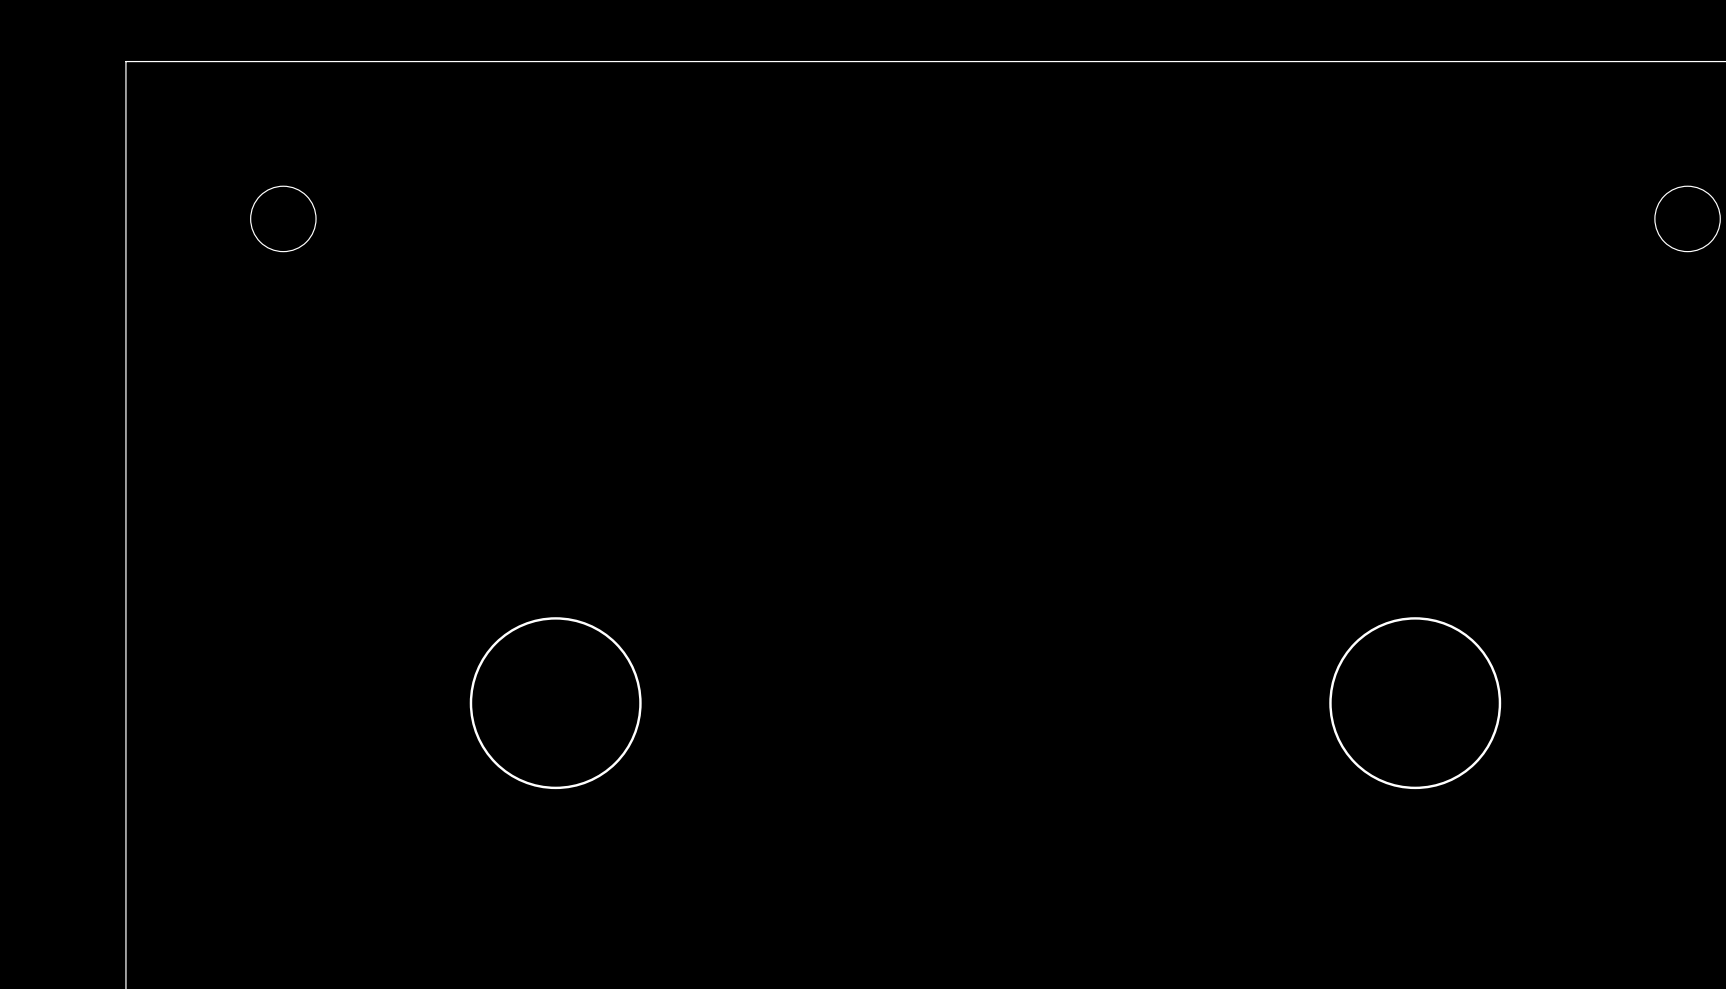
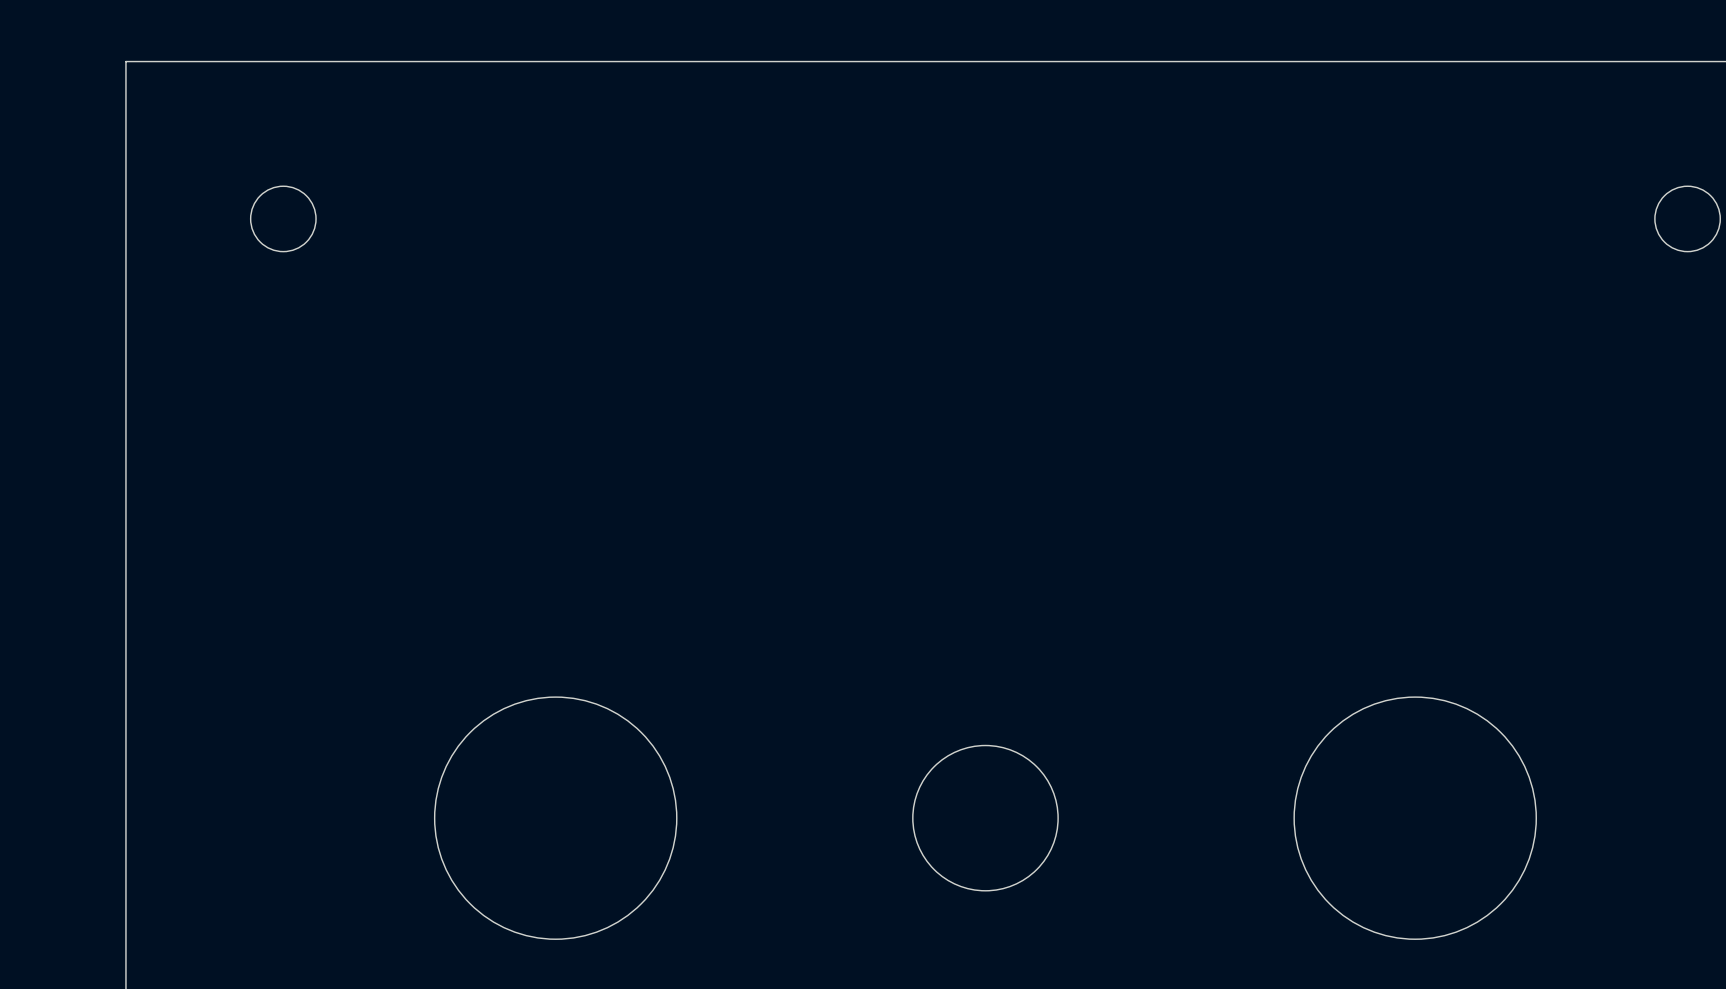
round board edge: [469, 617, 642, 790] -> none
round board edge: [1329, 617, 1502, 790] -> none
round board edge: none -> [434, 696, 678, 940]
round board edge: none -> [1293, 696, 1537, 940]
round board edge: none -> [912, 744, 1059, 892]

